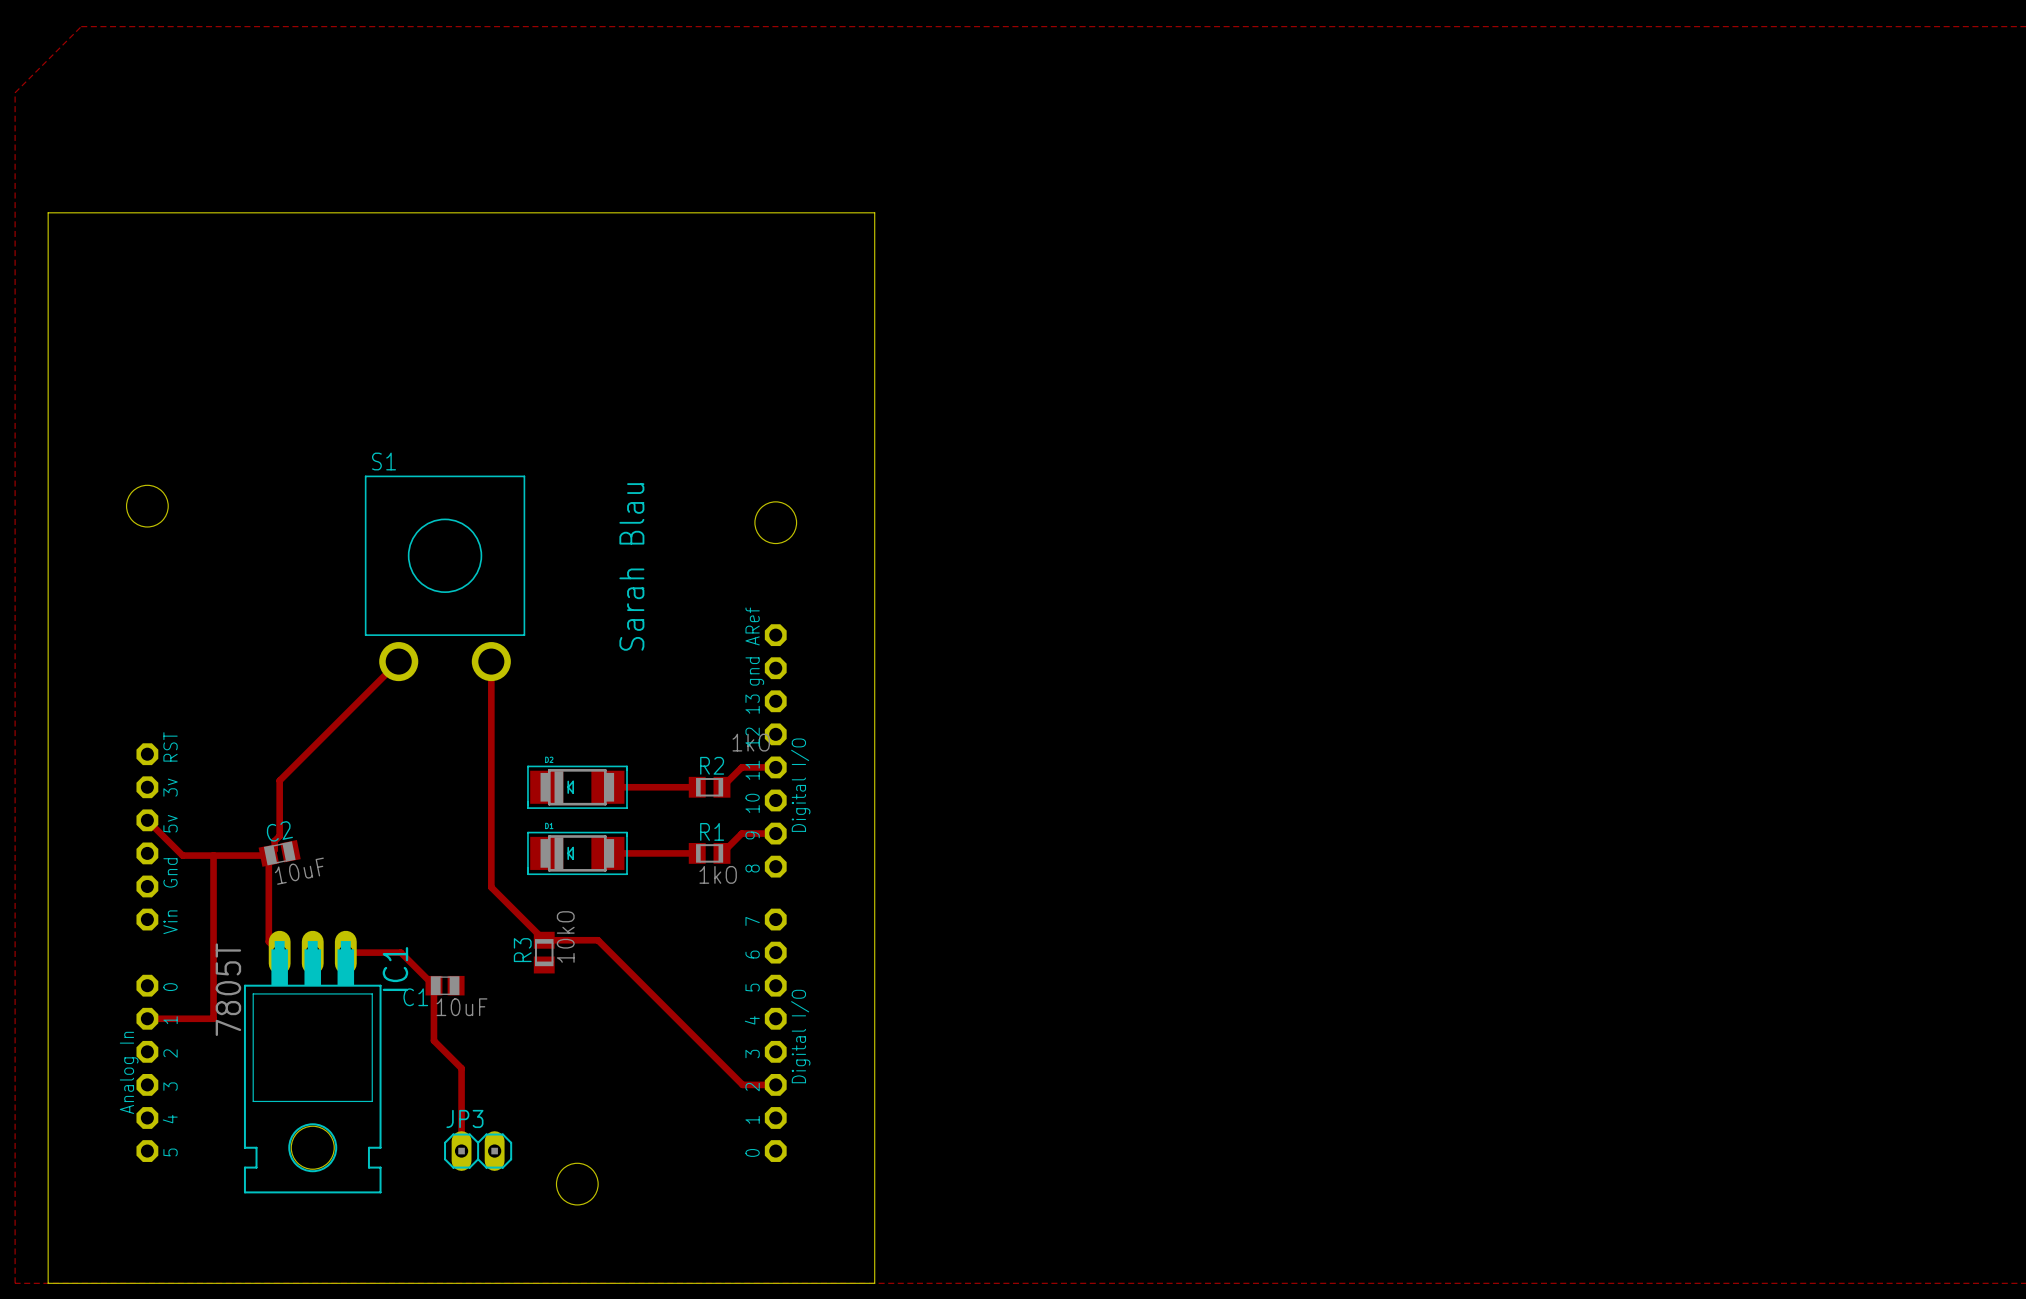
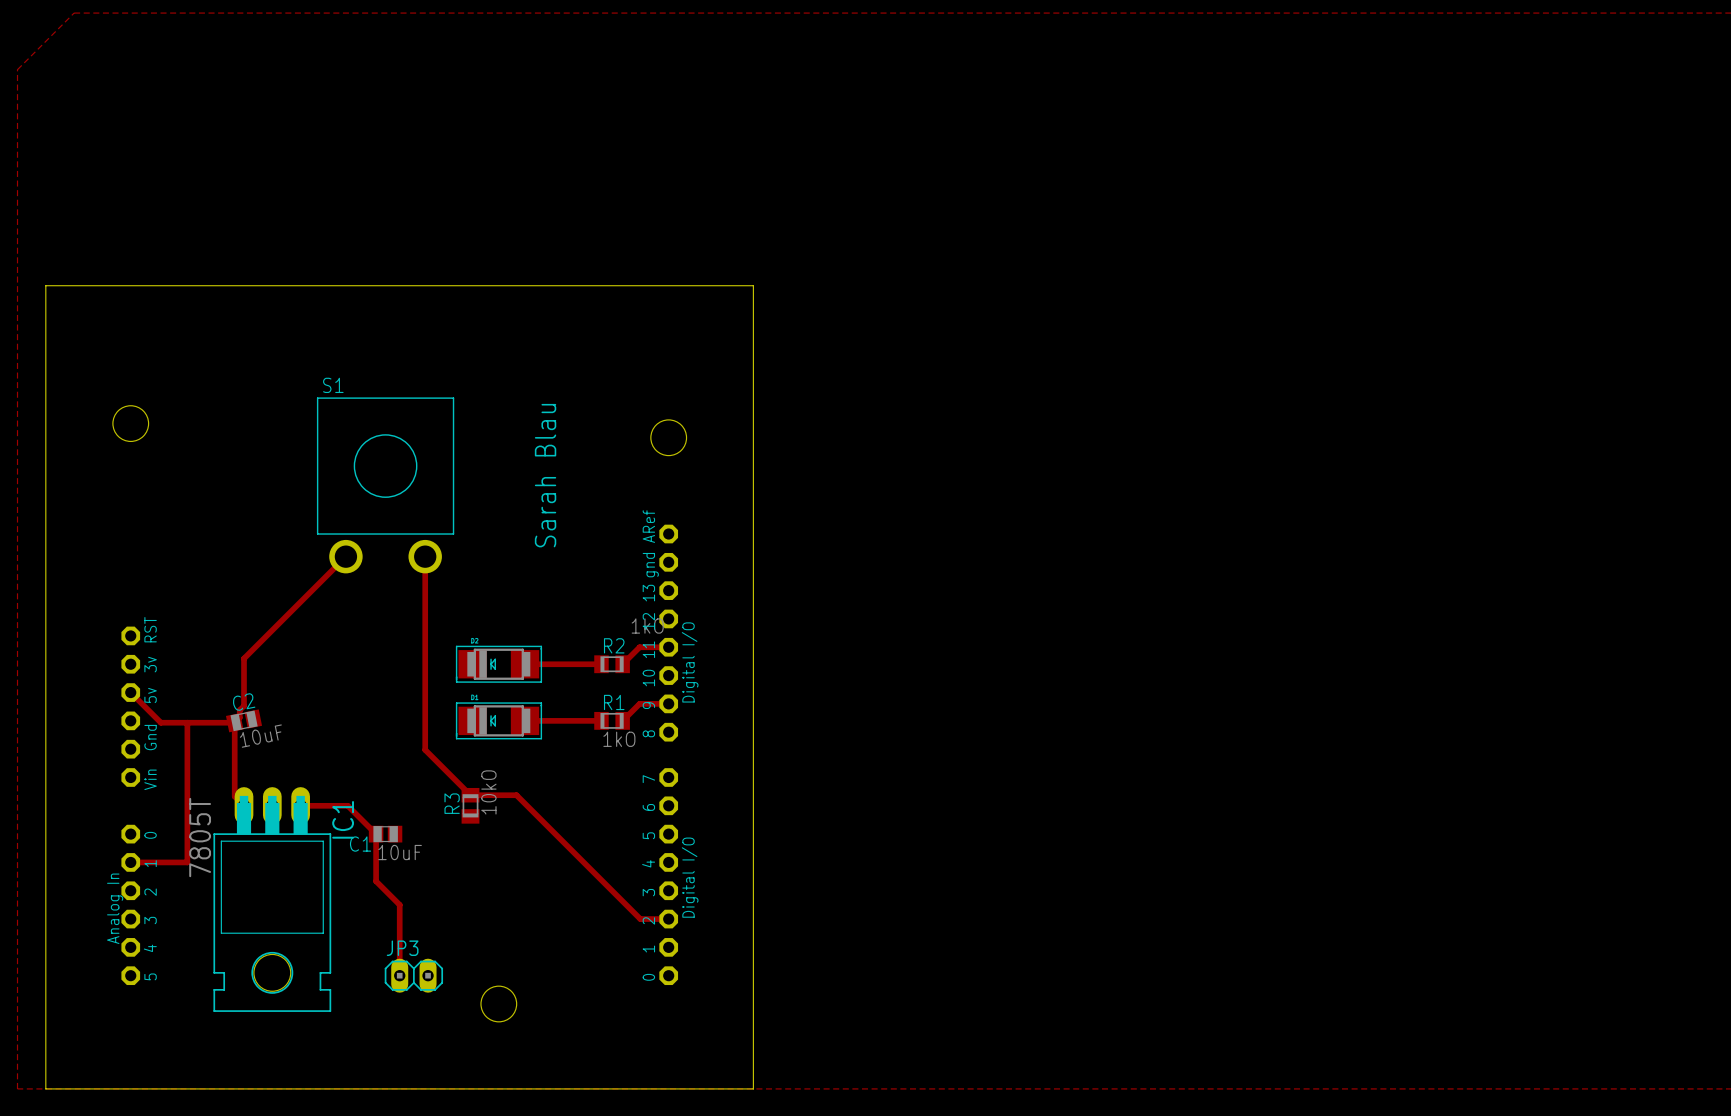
board edge: (48, 345) (48, 212) (874, 212) (874, 345) -> (45, 285) (753, 285)

